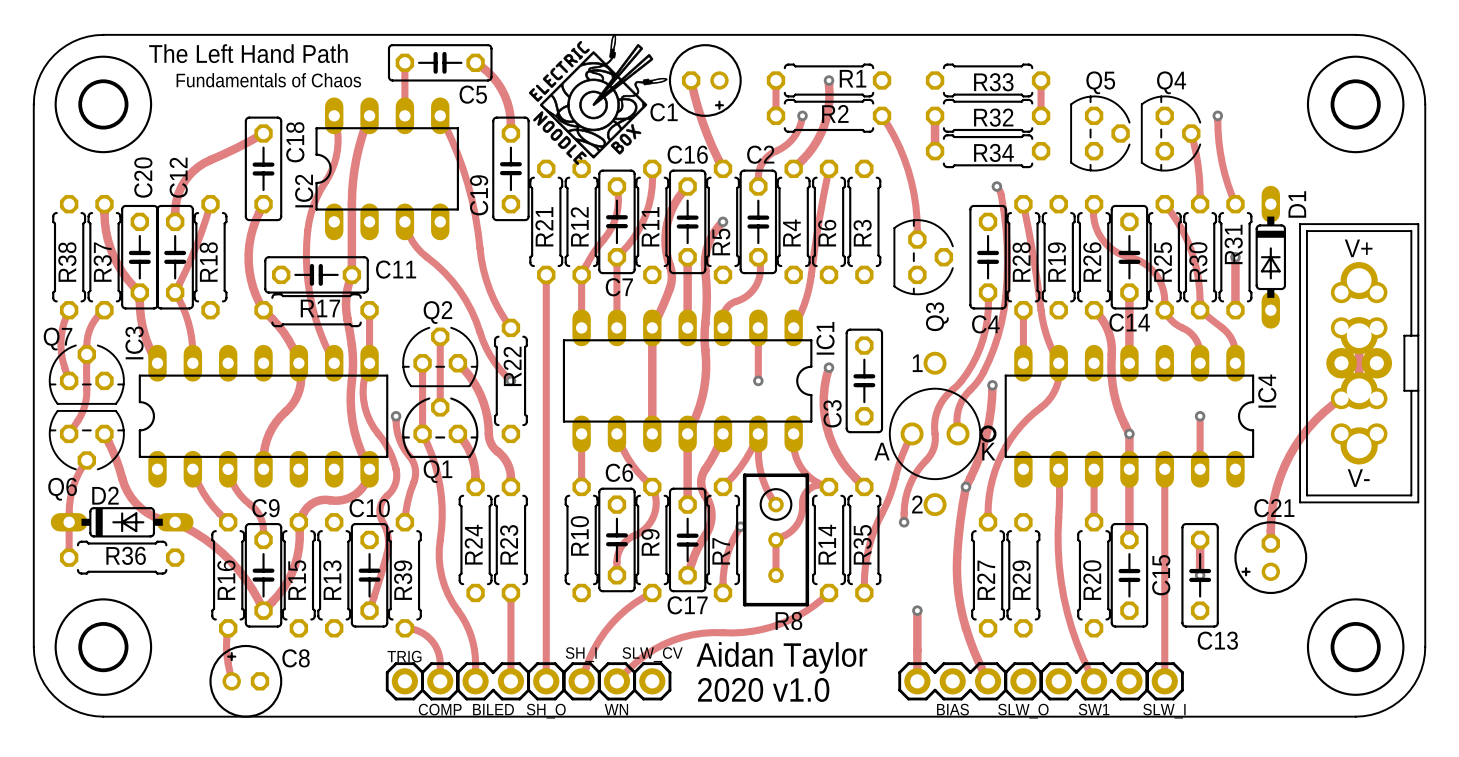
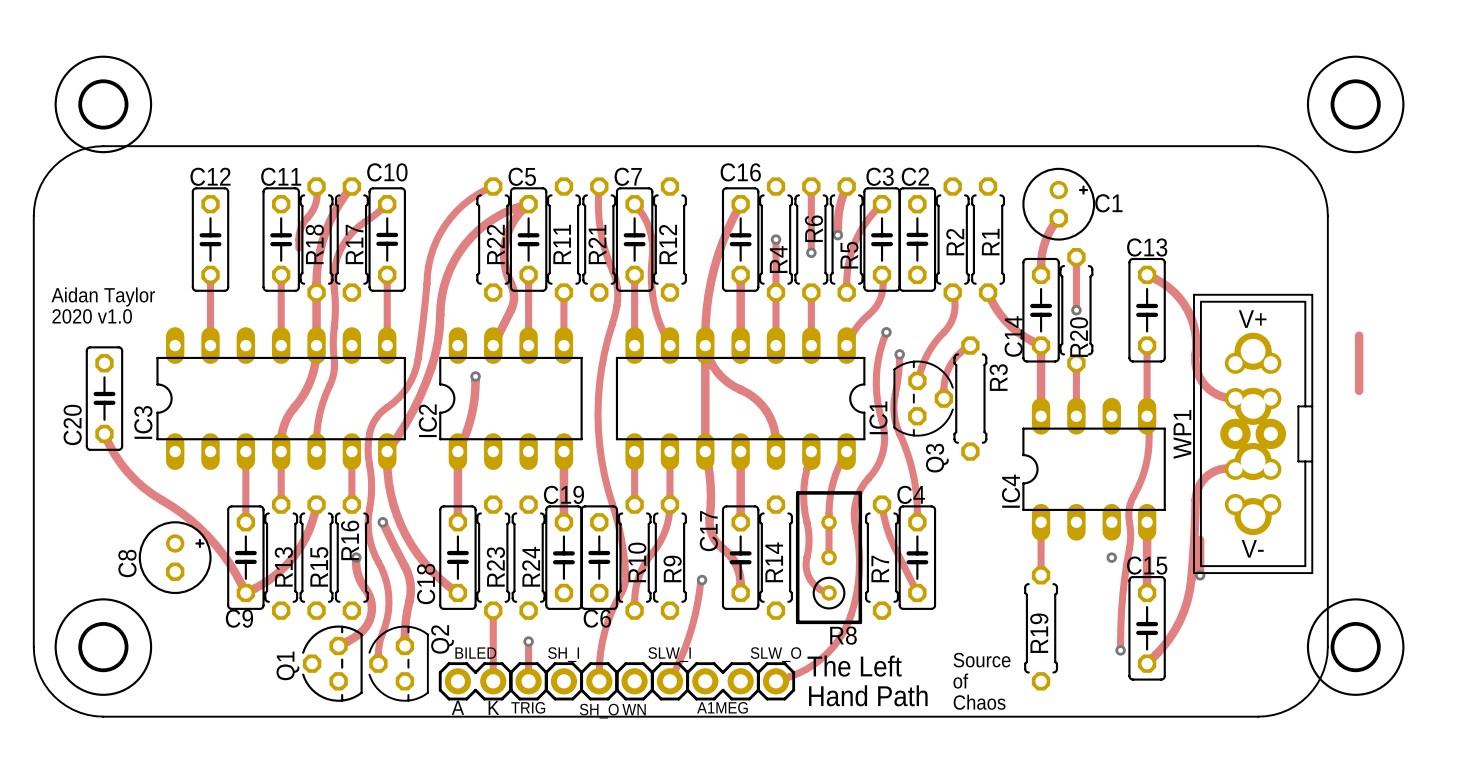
drawing: [529, 33, 668, 165] -> none
text: The Left Hand Path (248, 53) -> none
track: (404, 62) (404, 115) -> (563, 292) (563, 345)
C5 rotation: 0° (440, 62) -> 90° counterclockwise (528, 239)
C5 position: (440, 62) -> (528, 239)
track: (475, 62) (492, 76) (504, 95) (509, 109) (510, 133) -> none
text: Fundamentals of Chaos (268, 80) -> none
track: (691, 80) (702, 121) (722, 168) -> none
C1 rotation: 0° (705, 80) -> 90° counterclockwise (1058, 204)
C1 position: (705, 80) -> (1058, 204)
track: (776, 80) (776, 115) -> none
track: (829, 80) (829, 101) (824, 125) (813, 147) (793, 168) -> none
R1 rotation: 0° (829, 80) -> 90° clockwise (988, 239)
R1 position: (829, 80) -> (988, 239)
via: (829, 80) -> none
R33: (988, 80) -> none
track: (1041, 80) (1041, 115) -> none
C5 name position: C5 (473, 94) -> C5 (522, 176)
C1 name position: C1 (664, 112) -> C1 (1108, 203)
track: (334, 115) (338, 136) (336, 156) (310, 213) (306, 256) (312, 306) (319, 331) (334, 363) -> none
track: (369, 115) (358, 148) (354, 170) (351, 204) (351, 274) (346, 304) (352, 354) (350, 401) (352, 421) (357, 441) (369, 469) (369, 473) (362, 487) (353, 495) (341, 500) (317, 501) (304, 510) (298, 522) (298, 548) (291, 573) (278, 595) (263, 610) (252, 589) (238, 570) (213, 545) (175, 522) (153, 516) (136, 503) (124, 485) (116, 460) (104, 433) -> (316, 504) (305, 538) (290, 561) (270, 579) (245, 592) (229, 563) (215, 545) (190, 520) (135, 480) (114, 453) (104, 433)
track: (440, 115) (457, 154) (468, 184) (486, 280) (499, 309) (510, 327) -> none
track: (802, 115) (798, 129) (791, 140) (770, 154) (763, 161) (759, 171) (758, 186) -> none
via: (802, 115) -> none
R2 rotation: 0° (829, 115) -> 90° clockwise (952, 239)
R2 position: (829, 115) -> (952, 239)
track: (882, 115) (894, 136) (908, 170) (915, 206) (917, 239) -> none
track: (935, 115) (935, 151) -> none
R32: (988, 115) -> none
track: (1217, 115) (1222, 163) (1235, 204) -> none
via: (1217, 115) -> none
track: (263, 133) (204, 162) (193, 170) (184, 181) (178, 193) (175, 206) (175, 221) -> none
Q5: (1100, 133) -> none
Q4: (1171, 133) -> none
track: (1191, 133) (1197, 164) (1200, 204) -> none
R34: (988, 151) -> none
C18 rotation: 0° (263, 168) -> 180° (457, 557)
C18 position: (263, 168) -> (457, 557)
IC2 position: (387, 168) -> (510, 398)
C19 rotation: 0° (510, 168) -> 180° (563, 557)
C19 position: (510, 168) -> (563, 557)
track: (652, 168) (652, 187) (646, 214) (633, 238) (616, 257) (616, 327) -> none
track: (829, 168) (808, 290) (793, 327) -> none
C20 name position: C20 (143, 177) -> C20 (72, 424)
C12 name rotation: 0° (178, 177) -> 90° clockwise (210, 176)
track: none -> (316, 186) (315, 203) (301, 227) (298, 248)
track: none -> (351, 186) (334, 212) (319, 252) (316, 273) (315, 362) (308, 386) (287, 418) (282, 430) (281, 504)
track: none -> (493, 186) (477, 194) (456, 211) (436, 240) (428, 266) (420, 340) (414, 373) (403, 392) (375, 418) (369, 433) (368, 449) (371, 486) (368, 529) (372, 549) (384, 575) (388, 596) (387, 618) (379, 643) (378, 663)
track: none -> (599, 186) (600, 229) (605, 250) (616, 281) (617, 293) (615, 314) (601, 368) (598, 398) (598, 429) (604, 475) (621, 539) (625, 578) (624, 587) (611, 611) (604, 631) (600, 651) (599, 681)
track: (616, 186) (617, 207) (614, 221) (581, 274) (581, 327) -> none
track: (687, 186) (671, 210) (666, 230) (666, 252) (671, 280) (652, 327) (652, 433) -> none
track: none -> (811, 186) (811, 252)
track: none -> (846, 186) (838, 212) (837, 235)
track: (996, 186) (1001, 195) (1007, 246) (1007, 280) (1004, 309) (998, 335) (989, 360) (980, 376) (964, 397) (959, 405) (956, 420) (958, 433) -> none
via: (996, 186) -> none
C19 name position: C19 (479, 195) -> C19 (563, 494)
track: (104, 204) (105, 230) (110, 248) (122, 272) (139, 292) (140, 317) (144, 333) (157, 363) -> none
track: (210, 204) (196, 244) (175, 292) (188, 322) (191, 338) (192, 363) -> none
track: (263, 204) (250, 236) (248, 253) (250, 278) (263, 310) (278, 325) (292, 347) (298, 363) (301, 379) (295, 399) (276, 421) (269, 433) (264, 446) (263, 469) -> none
track: none -> (387, 204) (353, 231) (343, 243) (337, 257) (333, 280) (335, 308) (333, 343) (334, 367) (319, 413) (316, 451)
track: none -> (634, 204) (643, 215) (651, 235) (653, 300) (659, 322) (669, 345)
track: none -> (740, 204) (728, 228) (714, 268) (708, 295) (705, 336) (705, 451) (710, 484) (709, 526) (716, 542) (735, 564) (740, 579) (740, 592)
track: none -> (882, 204) (864, 224) (855, 240) (848, 265) (846, 292)
track: (1023, 204) (1042, 317) (1048, 340) (1058, 363) (1058, 378) (1051, 396) (1021, 425) (1001, 454) (990, 487) (988, 522) -> none
track: (1094, 204) (1094, 221) (1101, 237) (1113, 250) (1143, 262) (1154, 273) (1163, 291) (1166, 314) (1175, 323) (1188, 331) (1195, 338) (1199, 347) (1200, 363) -> none
track: (1164, 204) (1177, 221) (1191, 249) (1198, 280) (1200, 310) (1230, 336) (1234, 346) (1235, 363) -> none
board edge: (33, 215) (33, 104) (37, 81) (48, 61) (59, 50) (80, 38) (95, 35) (1355, 34) (1378, 38) (1399, 50) (1410, 61) (1421, 81) (1424, 96) (1425, 647) (1423, 662) (1418, 677) (1410, 690) (1399, 701) (1378, 712) (1355, 716) (1258, 716) -> (33, 215) (37, 192) (44, 178) (54, 166) (66, 156) (80, 150) (103, 146) (1258, 146) (1281, 150) (1301, 161) (1312, 172) (1323, 192) (1327, 207) (1327, 647) (1323, 670) (1317, 684) (1307, 696) (1295, 706) (1281, 712) (1258, 716)
track: none -> (1058, 218) (1048, 234) (1043, 246) (1041, 274)
track: (404, 221) (409, 235) (416, 247) (444, 272) (459, 290) (471, 310) (490, 356) (510, 380) -> none
R21 position: (546, 221) -> (599, 239)
R12 position: (581, 221) -> (669, 239)
C7 rotation: 0° (616, 221) -> 180° (634, 239)
R11 position: (652, 221) -> (563, 239)
C16 position: (687, 221) -> (740, 239)
track: (722, 221) (711, 237) (705, 257) (705, 378) (699, 407) (687, 433) (687, 504) -> none
R5 position: (722, 221) -> (846, 239)
via: (722, 221) -> none
C2 rotation: 0° (758, 221) -> 180° (917, 239)
C2 position: (758, 221) -> (917, 239)
R4 position: (793, 221) -> (776, 239)
R6 position: (829, 221) -> (811, 239)
R3 position: (864, 221) -> (970, 398)
R4 name position: R4 (791, 232) -> R4 (778, 259)
R6 name position: R6 (827, 233) -> R6 (813, 228)
R3 name position: R3 (862, 233) -> R3 (998, 377)
via: none -> (837, 235)
track: none -> (776, 239) (776, 345)
via: none -> (776, 239)
R5 name position: R5 (721, 241) -> R5 (849, 255)
via: none -> (811, 252)
R38: (69, 257) -> none
R37: (104, 257) -> none
C20 rotation: 0° (139, 257) -> 180° (104, 398)
C20 position: (139, 257) -> (104, 398)
C12 position: (175, 257) -> (210, 239)
R18 position: (210, 257) -> (316, 239)
track: (687, 257) (687, 327) -> (740, 274) (740, 345)
track: (758, 257) (760, 272) (756, 284) (746, 296) (726, 308) (723, 316) (722, 327) -> none
Q3 position: (923, 257) -> (923, 398)
C4 position: (988, 257) -> (917, 557)
R28: (1023, 257) -> none
R19 position: (1058, 257) -> (1041, 628)
R26: (1094, 257) -> none
C14 position: (1129, 257) -> (1041, 310)
R25: (1164, 257) -> none
R30: (1200, 257) -> none
track: (1235, 257) (1235, 310) -> (1076, 363) (1076, 416)
R31: (1235, 257) -> none
via: (1235, 257) -> none
D1: (1270, 257) -> none
track: none -> (210, 274) (210, 345)
track: none -> (281, 274) (281, 345)
C11 rotation: 0° (316, 274) -> 90° counterclockwise (281, 239)
track: none -> (528, 274) (528, 345)
track: (546, 274) (546, 681) -> none
track: none -> (634, 274) (634, 345)
track: none -> (882, 274) (882, 288) (879, 300) (858, 324) (846, 345)
track: none -> (1147, 274) (1168, 287) (1179, 297) (1187, 310) (1195, 331) (1196, 368) (1205, 385) (1216, 394) (1235, 398) (1253, 406)
track: none -> (952, 292) (955, 305) (953, 317) (927, 354) (917, 380)
track: (988, 292) (987, 320) (980, 348) (967, 373) (945, 396) (937, 409) (934, 423) (933, 448) (909, 484) (905, 498) (904, 522) -> (988, 292) (1000, 314) (1011, 326) (1041, 345) (1041, 416)
track: (1129, 292) (1129, 363) -> (1147, 522) (1147, 592)
text: none -> Aidan Taylor (103, 296)
track: (69, 310) (62, 331) (60, 345) (62, 360) (69, 380) -> none
track: (104, 310) (94, 321) (87, 335) (86, 400) (80, 416) (69, 433) -> none
R17 rotation: 0° (316, 310) -> 90° clockwise (351, 239)
R17 position: (316, 310) -> (351, 239)
track: (369, 310) (369, 363) (363, 384) (363, 399) (370, 421) (392, 456) (396, 475) (394, 486) (383, 499) (380, 508) (380, 517) (387, 533) (388, 545) (369, 610) -> none
track: (1023, 310) (1023, 363) -> (1076, 257) (1076, 310)
via: none -> (1076, 310)
track: (1094, 310) (1105, 324) (1109, 336) (1114, 393) (1118, 409) (1129, 433) (1129, 539) -> none
Q2 name position: Q2 (437, 312) -> Q2 (442, 639)
text: none -> 2020 v1.0 (92, 316)
C14 name rotation: 0° (1129, 322) -> 90° counterclockwise (1013, 336)
C14 name position: C14 (1129, 322) -> C14 (1013, 336)
C4 name position: C4 (985, 324) -> C4 (911, 494)
track: (758, 327) (758, 380) -> (811, 292) (811, 345)
track: none -> (886, 332) (878, 358) (876, 376) (876, 394) (883, 426) (884, 445) (879, 462) (861, 488) (854, 507) (859, 571) (856, 593) (851, 615) (839, 639) (820, 659) (797, 673) (776, 681)
via: none -> (886, 332)
track: (440, 336) (440, 407) -> (387, 274) (387, 345)
IC1 name position: IC1 (825, 338) -> IC1 (878, 417)
IC3 name position: IC3 (134, 342) -> IC3 (143, 422)
IC4 footprint: [1004, 344, 1255, 488] -> [1022, 397, 1166, 541]
track: none -> (493, 345) (513, 300) (513, 290) (504, 262) (505, 240) (513, 220) (528, 204) (510, 210) (485, 224) (471, 236) (454, 259) (446, 277) (441, 295) (437, 341) (431, 367) (412, 411) (387, 451)
track: none -> (705, 345) (713, 366) (722, 377) (752, 396) (766, 410) (774, 429) (776, 451)
track: none -> (970, 345) (957, 355) (948, 368) (944, 384) (943, 398)
track: none -> (1147, 345) (1148, 446) (1142, 477) (1129, 508) (1130, 542) (1122, 594) (1120, 650)
track: none -> (899, 354) (894, 414) (912, 472) (916, 492) (917, 522)
via: none -> (899, 354)
Q2 rotation: 0° (440, 357) -> 90° counterclockwise (398, 663)
Q2 position: (440, 357) -> (398, 663)
track: (422, 363) (422, 433) (434, 464) (441, 496) (440, 567) (448, 594) (471, 635) (475, 656) (475, 681) -> none
track: (457, 363) (473, 381) (480, 395) (487, 418) (490, 441) (507, 463) (510, 474) (510, 486) -> none
part: (1359, 363) -> none
R22 name position: R22 (512, 366) -> R22 (495, 244)
track: (829, 367) (824, 387) (823, 406) (829, 436) (842, 462) (864, 486) -> none
via: (829, 367) -> none
Q7: (86, 374) -> none
track: none -> (475, 376) (471, 417) (457, 451) (457, 522)
R22 position: (510, 380) -> (493, 239)
via position: (510, 380) -> (475, 376)
IC1 position: (687, 380) -> (740, 398)
via: (758, 380) -> none
C3 rotation: 0° (864, 380) -> 180° (882, 239)
C3 position: (864, 380) -> (882, 239)
track: (992, 385) (986, 433) (979, 456) (965, 486) (957, 557) (957, 581) (962, 616) (969, 639) (983, 672) -> none
via: (992, 385) -> none
track: (1359, 390) (1341, 398) (1323, 412) (1308, 428) (1289, 456) (1280, 476) (1274, 497) (1270, 543) -> none
IC4 name position: IC4 (1267, 391) -> IC4 (1011, 491)
C3 name position: C3 (832, 413) -> C3 (880, 176)
IC3 position: (263, 416) -> (281, 398)
track: (396, 416) (399, 439) (412, 460) (415, 471) (404, 522) -> none
via: (396, 416) -> none
track: (1200, 416) (1200, 469) -> (1041, 522) (1041, 575)
via: (1200, 416) -> none
Q1 rotation: 0° (440, 427) -> 90° counterclockwise (332, 663)
Q1 position: (440, 427) -> (332, 663)
track: (457, 433) (468, 448) (472, 460) (475, 486) -> none
track: (581, 433) (581, 486) -> (634, 451) (634, 504)
track: (616, 433) (632, 464) (652, 486) (656, 502) (654, 515) (647, 525) (626, 540) (620, 549) (617, 558) (616, 575) -> none
track: (722, 433) (701, 476) (701, 488) (710, 507) (711, 519) (687, 575) -> none
track: (793, 433) (794, 452) (800, 466) (810, 478) (829, 486) (818, 485) (807, 490) (803, 498) (802, 512) (798, 522) (791, 531) (776, 539) (776, 575) -> none
track: (912, 433) (902, 455) (889, 496) (871, 538) (865, 565) (864, 592) -> none
part: (942, 433) -> none
via: (1129, 433) -> none
WP1: none -> (1253, 433)
Q6: (86, 440) -> none
track: none -> (387, 442) (388, 482) (393, 504) (401, 525) (411, 545) (424, 563) (440, 579) (457, 592)
track: none -> (245, 451) (245, 522)
track: none -> (351, 451) (351, 504)
track: none -> (563, 451) (563, 522)
track: none -> (669, 451) (669, 504) (667, 524) (659, 542) (644, 564) (639, 575) (634, 595) (634, 610)
track: none -> (846, 451) (836, 473) (830, 497) (829, 557)
track: (86, 460) (76, 478) (70, 499) (69, 557) -> none
track: none -> (1253, 461) (1235, 469) (1227, 468) (1215, 471) (1208, 475) (1200, 484) (1196, 496) (1192, 559) (1187, 600) (1175, 629) (1163, 647) (1147, 663)
track: (192, 469) (208, 500) (228, 522) -> none
track: (228, 469) (235, 489) (260, 516) (263, 527) (263, 539) -> none
track: (1058, 469) (1058, 549) (1061, 581) (1071, 628) (1089, 672) -> none
track: (1094, 469) (1094, 522) -> none
track: (1164, 469) (1164, 681) -> none
Q1 name position: Q1 (437, 471) -> Q1 (287, 665)
C6 name position: C6 (619, 472) -> C6 (597, 618)
track: (722, 486) (745, 459) (758, 433) (760, 472) (765, 486) (776, 504) -> none
via: (965, 486) -> none
track: none -> (882, 504) (892, 541) (917, 592)
C9 name position: C9 (265, 508) -> C9 (239, 618)
D2: (122, 522) -> none
track: none -> (382, 522) (404, 566)
via: none -> (382, 522)
via: (904, 522) -> none
track: (740, 526) (730, 546) (725, 561) (722, 592) -> none
via position: (740, 526) -> (702, 580)
R10 name position: R10 (579, 535) -> R10 (637, 562)
R24 position: (475, 539) -> (528, 557)
R23 position: (510, 539) -> (493, 557)
R10 position: (581, 539) -> (634, 557)
C6 position: (616, 539) -> (599, 557)
R9 position: (652, 539) -> (669, 557)
C17 position: (687, 539) -> (740, 557)
R7 position: (722, 539) -> (882, 557)
R8 rotation: 0° (776, 539) -> 180° (829, 557)
R14 position: (829, 539) -> (776, 557)
R35: (864, 539) -> none
R9 name position: R9 (650, 542) -> R9 (672, 568)
R24 name position: R24 (473, 544) -> R24 (531, 566)
R23 name position: R23 (509, 544) -> R23 (495, 566)
R36: (122, 557) -> none
track: none -> (356, 557) (357, 573) (370, 599) (371, 615) (366, 626) (360, 632) (338, 645)
via: none -> (356, 557)
via: none -> (1111, 557)
C21: (1270, 557) -> none
track: none -> (404, 566) (409, 577) (410, 589) (406, 619) (404, 645)
R16 position: (228, 575) -> (351, 557)
C9 position: (263, 575) -> (245, 557)
R15 position: (298, 575) -> (316, 557)
R13 position: (334, 575) -> (281, 557)
C10 position: (369, 575) -> (387, 239)
R39: (404, 575) -> none
R27: (988, 575) -> none
R29: (1023, 575) -> none
R20 position: (1094, 575) -> (1076, 310)
C15 position: (1129, 575) -> (1147, 628)
C15 name rotation: 0° (1161, 575) -> 90° clockwise (1147, 565)
C13 position: (1200, 575) -> (1147, 310)
R16 name position: R16 (226, 580) -> R16 (350, 540)
R15 name position: R15 (297, 580) -> R15 (319, 566)
R13 name position: R13 (332, 580) -> R13 (283, 566)
track: none -> (702, 580) (691, 627) (674, 672)
R20 name position: R20 (1092, 580) -> R20 (1079, 337)
track: (510, 592) (510, 681) -> none
track: (652, 592) (626, 609) (605, 631) (589, 658) (581, 681) -> none
track: (829, 592) (797, 615) (770, 627) (742, 632) (702, 633) (672, 640) (645, 654) (616, 681) -> (829, 592) (814, 585) (808, 577) (806, 567) (809, 539) (804, 504) (804, 486) (811, 451)
C17 name rotation: 0° (687, 605) -> 90° counterclockwise (708, 531)
C17 name position: C17 (687, 605) -> C17 (708, 531)
track: none -> (493, 610) (493, 681)
track: (917, 610) (917, 681) -> (740, 451) (740, 522)
via: (917, 610) -> none
track: (228, 628) (226, 654) (231, 681) -> none
track: (404, 628) (422, 633) (435, 645) (439, 659) (440, 681) -> none
C13 name position: C13 (1217, 640) -> C13 (1147, 247)
track: none -> (528, 641) (528, 681)
via: none -> (528, 641)
via: none -> (1120, 650)
TRIG name position: TRIG (404, 656) -> TRIG (528, 707)
text: Aidan Taylor (781, 657) -> none
C8 name position: C8 (296, 658) -> C8 (127, 563)
text: none -> Source (982, 660)
text: none -> The Left (854, 666)
C8 rotation: 0° (245, 681) -> 90° clockwise (175, 557)
C8 position: (245, 681) -> (175, 557)
TRIG position: (404, 681) -> (528, 681)
COMP: (440, 681) -> none
BILED position: (493, 681) -> (475, 681)
SH_O position: (546, 681) -> (599, 681)
SH_I position: (581, 681) -> (563, 681)
WN position: (616, 681) -> (634, 681)
SLW_CV: (652, 681) -> none
SLW_I: none -> (669, 681)
A1MEG: none -> (722, 681)
BIAS: (952, 681) -> none
text: none -> of (960, 681)
SLW_O position: (1023, 681) -> (776, 681)
SW1: (1094, 681) -> none
SLW_I: (1164, 681) -> none
text: 2020 v1.0 (763, 689) -> none
text: none -> Hand Path (868, 695)
text: none -> Chaos (979, 702)
text: none -> A (457, 707)
text: none -> K (493, 707)
BILED name position: BILED (493, 709) -> BILED (475, 653)
SLW_O name position: SLW_O (1023, 711) -> SLW_O (775, 654)

